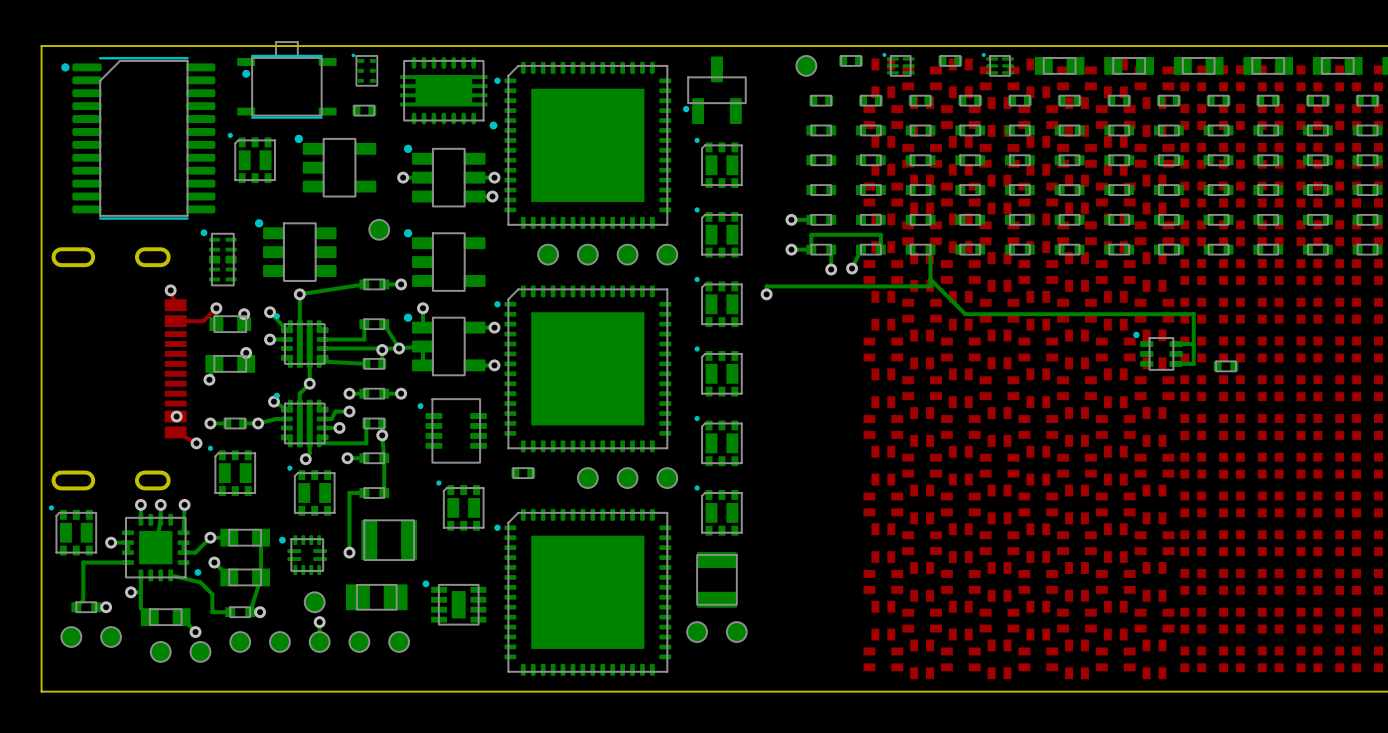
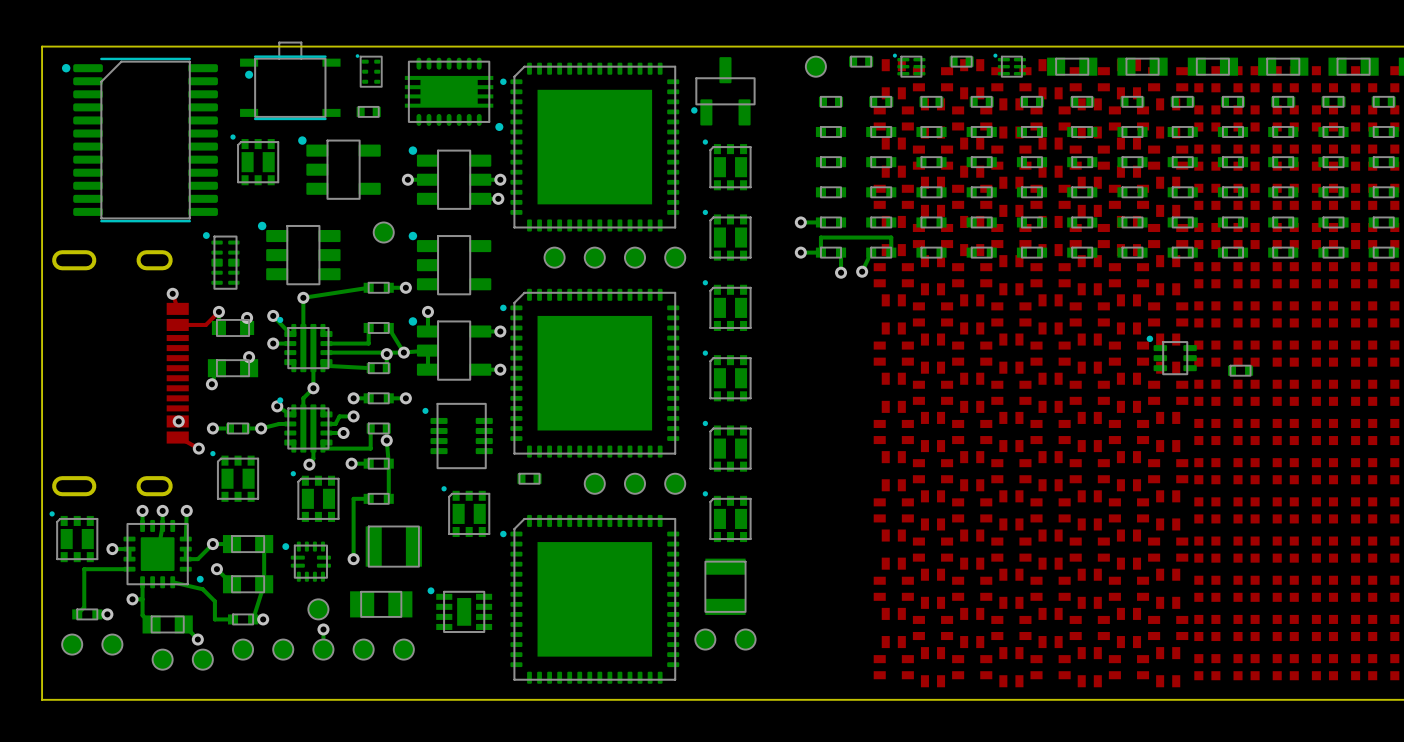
bottom track: (930, 249) (930, 286) (766, 286) (766, 294) -> none
bottom track: (930, 279) (965, 314) (1193, 314) (1193, 363) (1176, 363) -> none
via: (766, 294) -> none
bottom track: (1193, 344) (1176, 344) -> none

